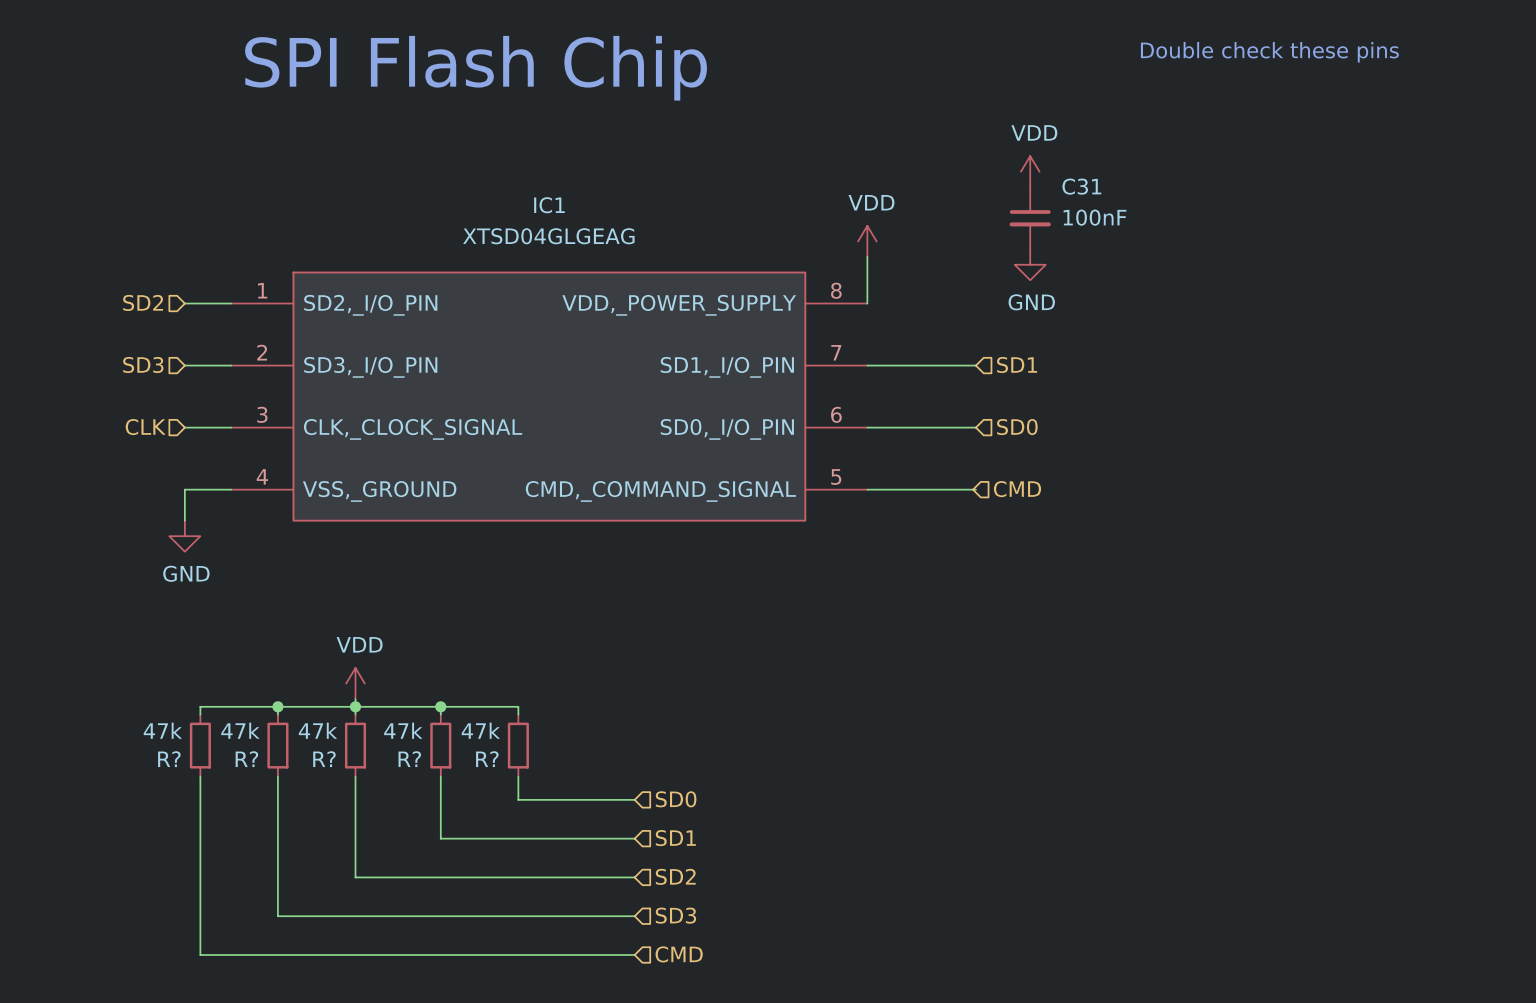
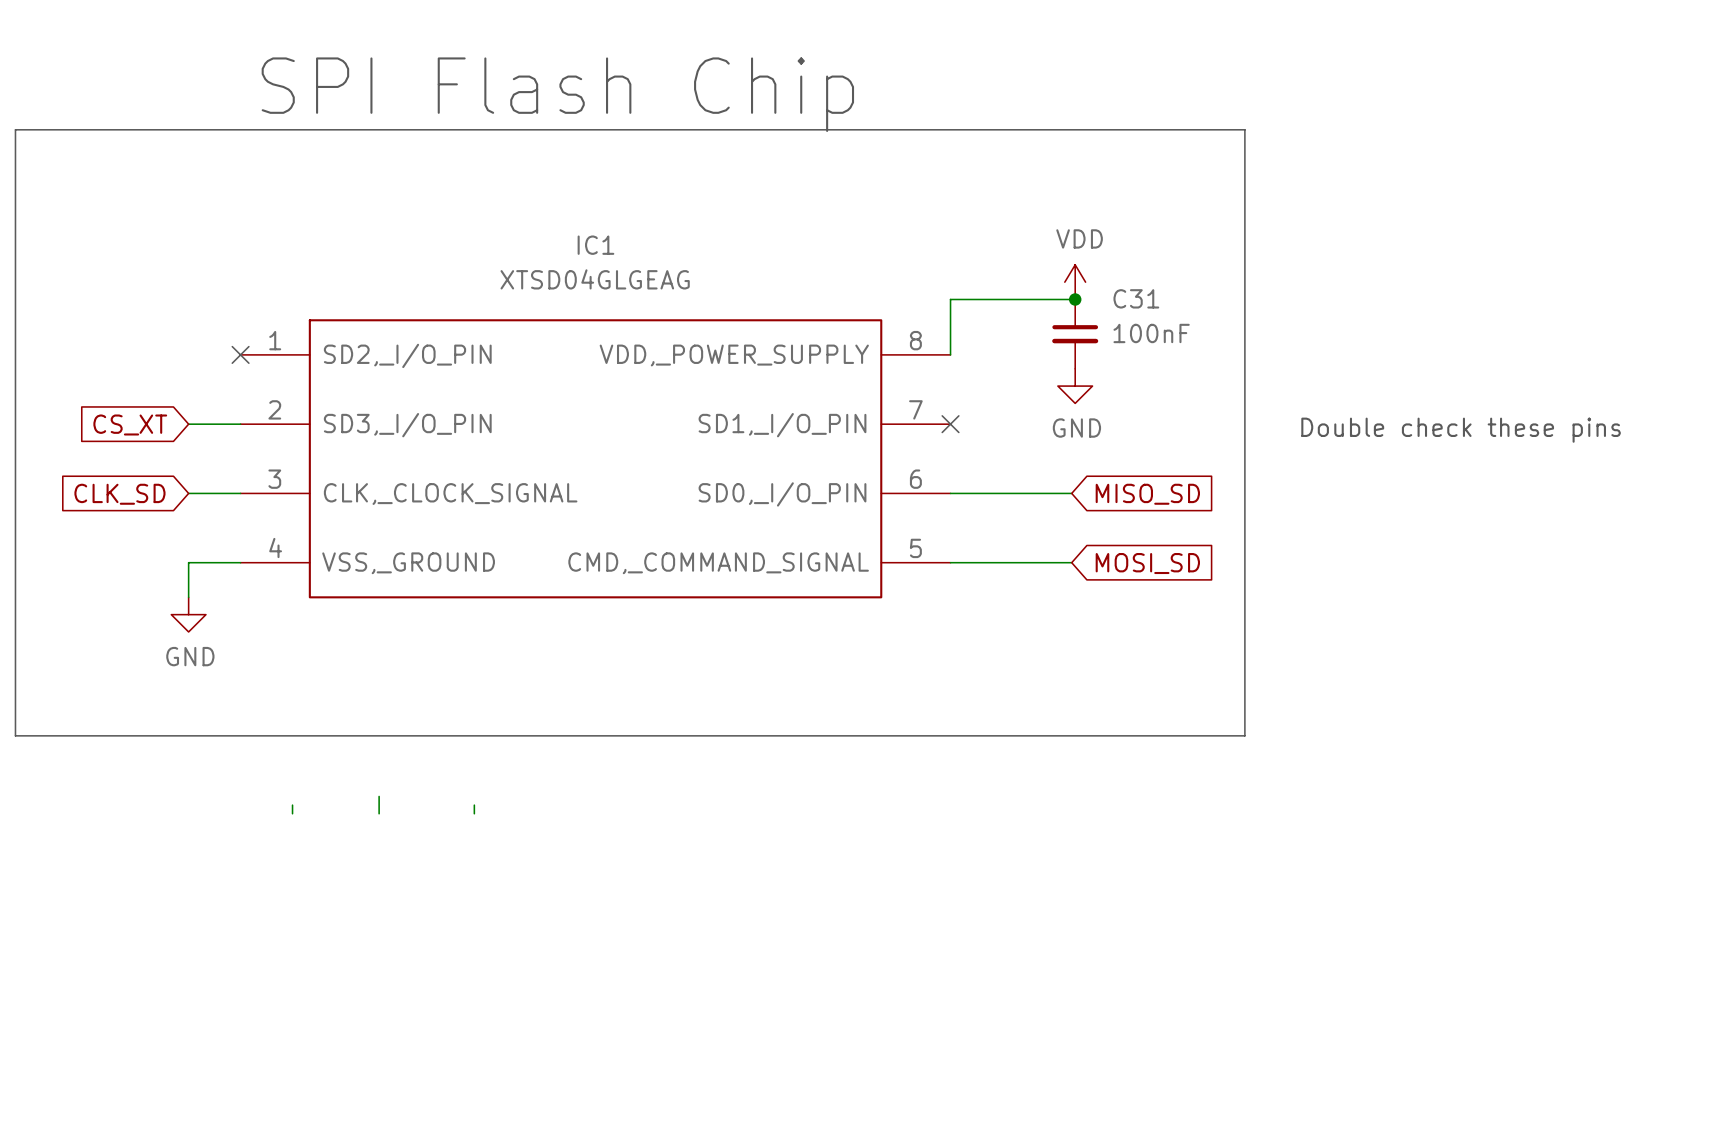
text: Double check these pins (1269, 52) -> none
line: none -> (15, 129) (1244, 129) (1244, 735) (15, 735) (15, 129)
power symbol: VDD (1030, 171) -> none
C31 position: (1030, 218) -> (1075, 334)
power symbol: none -> VDD (1075, 282)
power symbol: VDD (867, 241) -> none
wire: none -> (1075, 299) (950, 299) (950, 302)
junction: none -> (1075, 299)
power symbol position: GND (1030, 264) -> GND (1075, 386)
hierarchical label: SD2 (143, 302) -> none
wire: (184, 303) (231, 303) -> none
no-connect mark: none -> (240, 354)
hierarchical label: SD3 (143, 365) -> none
wire: (867, 365) (975, 365) -> none
no-connect mark: none -> (950, 424)
hierarchical label: SD1 (1017, 365) -> none
global label: none -> CS_XT (130, 424)
text: none -> Double check these pins (1461, 430)
hierarchical label: CLK (145, 427) -> none
hierarchical label: SD0 (1017, 427) -> none
global label: none -> CLK_SD (119, 494)
global label: none -> MISO_SD (1147, 494)
hierarchical label: CMD (1017, 489) -> none
global label: none -> MOSI_SD (1147, 563)
power symbol: VDD (355, 683) -> none
junction: (277, 706) -> none
junction: (355, 706) -> none
junction: (440, 706) -> none
wire: (200, 714) (200, 706) (518, 706) (518, 714) -> none
R?: 47k (200, 745) -> none
R?: 47k (277, 745) -> none
R?: 47k (355, 745) -> none
R?: 47k (440, 745) -> none
R?: 47k (518, 745) -> none
wire: (200, 776) (200, 954) (634, 954) -> none
wire: (277, 776) (277, 916) (634, 916) -> none
wire: (355, 776) (355, 877) (634, 877) -> none
wire: (440, 776) (440, 838) (634, 838) -> none
wire: (518, 776) (518, 799) (634, 799) -> none
hierarchical label: SD0 (676, 799) -> none
hierarchical label: SD1 (675, 838) -> none
hierarchical label: SD2 (675, 876) -> none
hierarchical label: SD3 (675, 915) -> none
hierarchical label: CMD (679, 954) -> none

